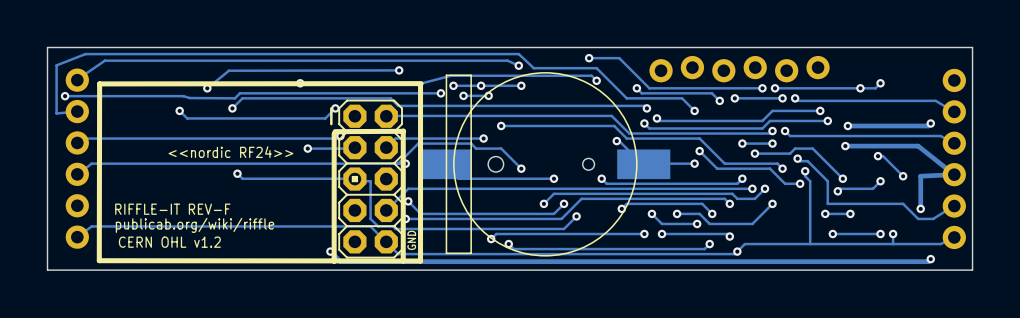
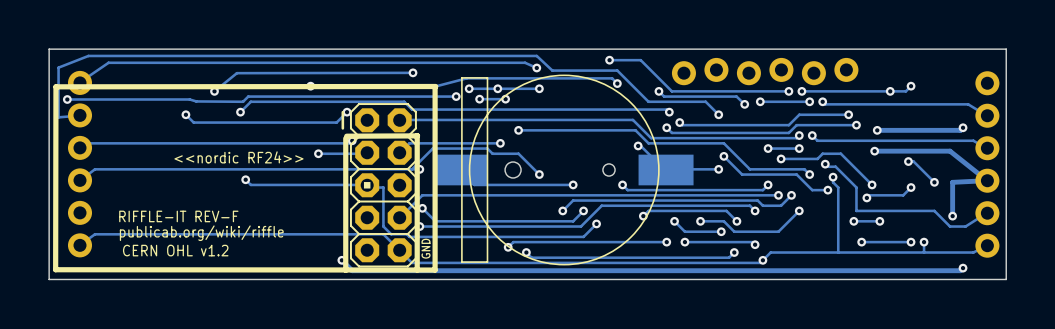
line: (421, 83) (99, 83) (99, 260) -> (435, 86) (55, 86) (55, 269) (102, 269)

